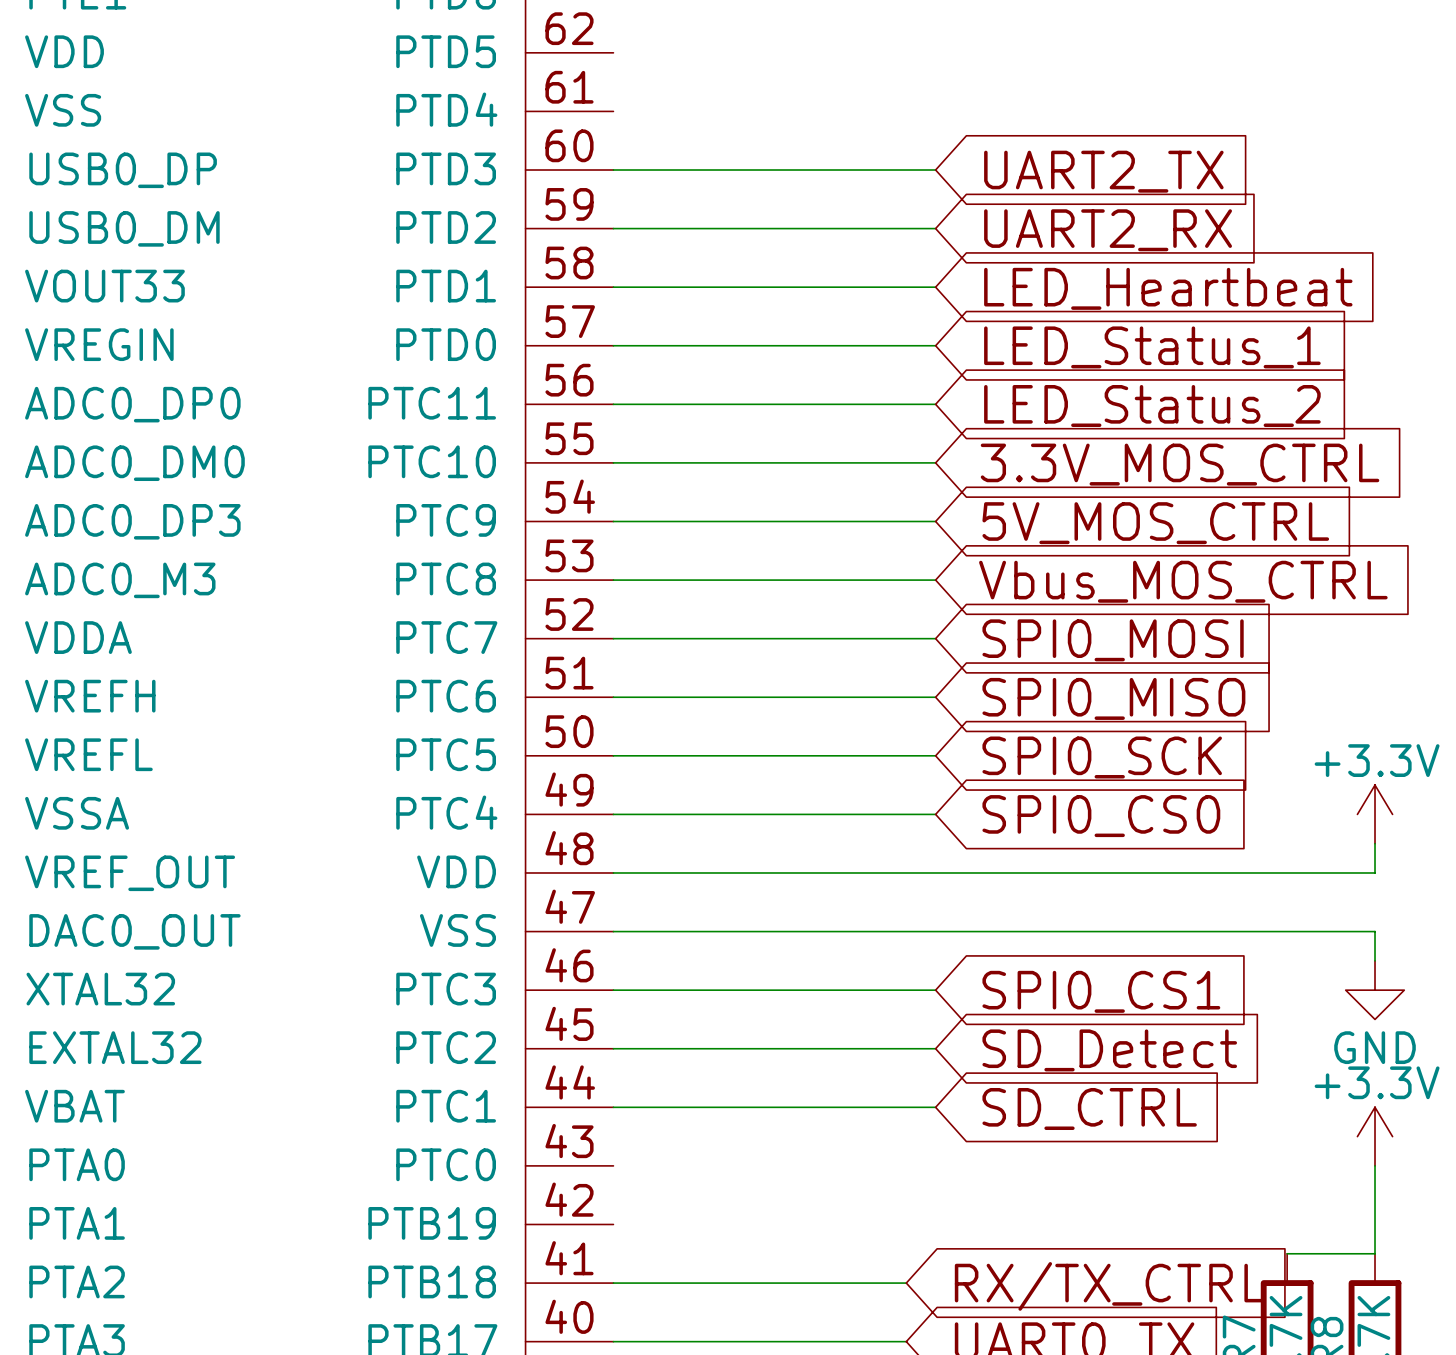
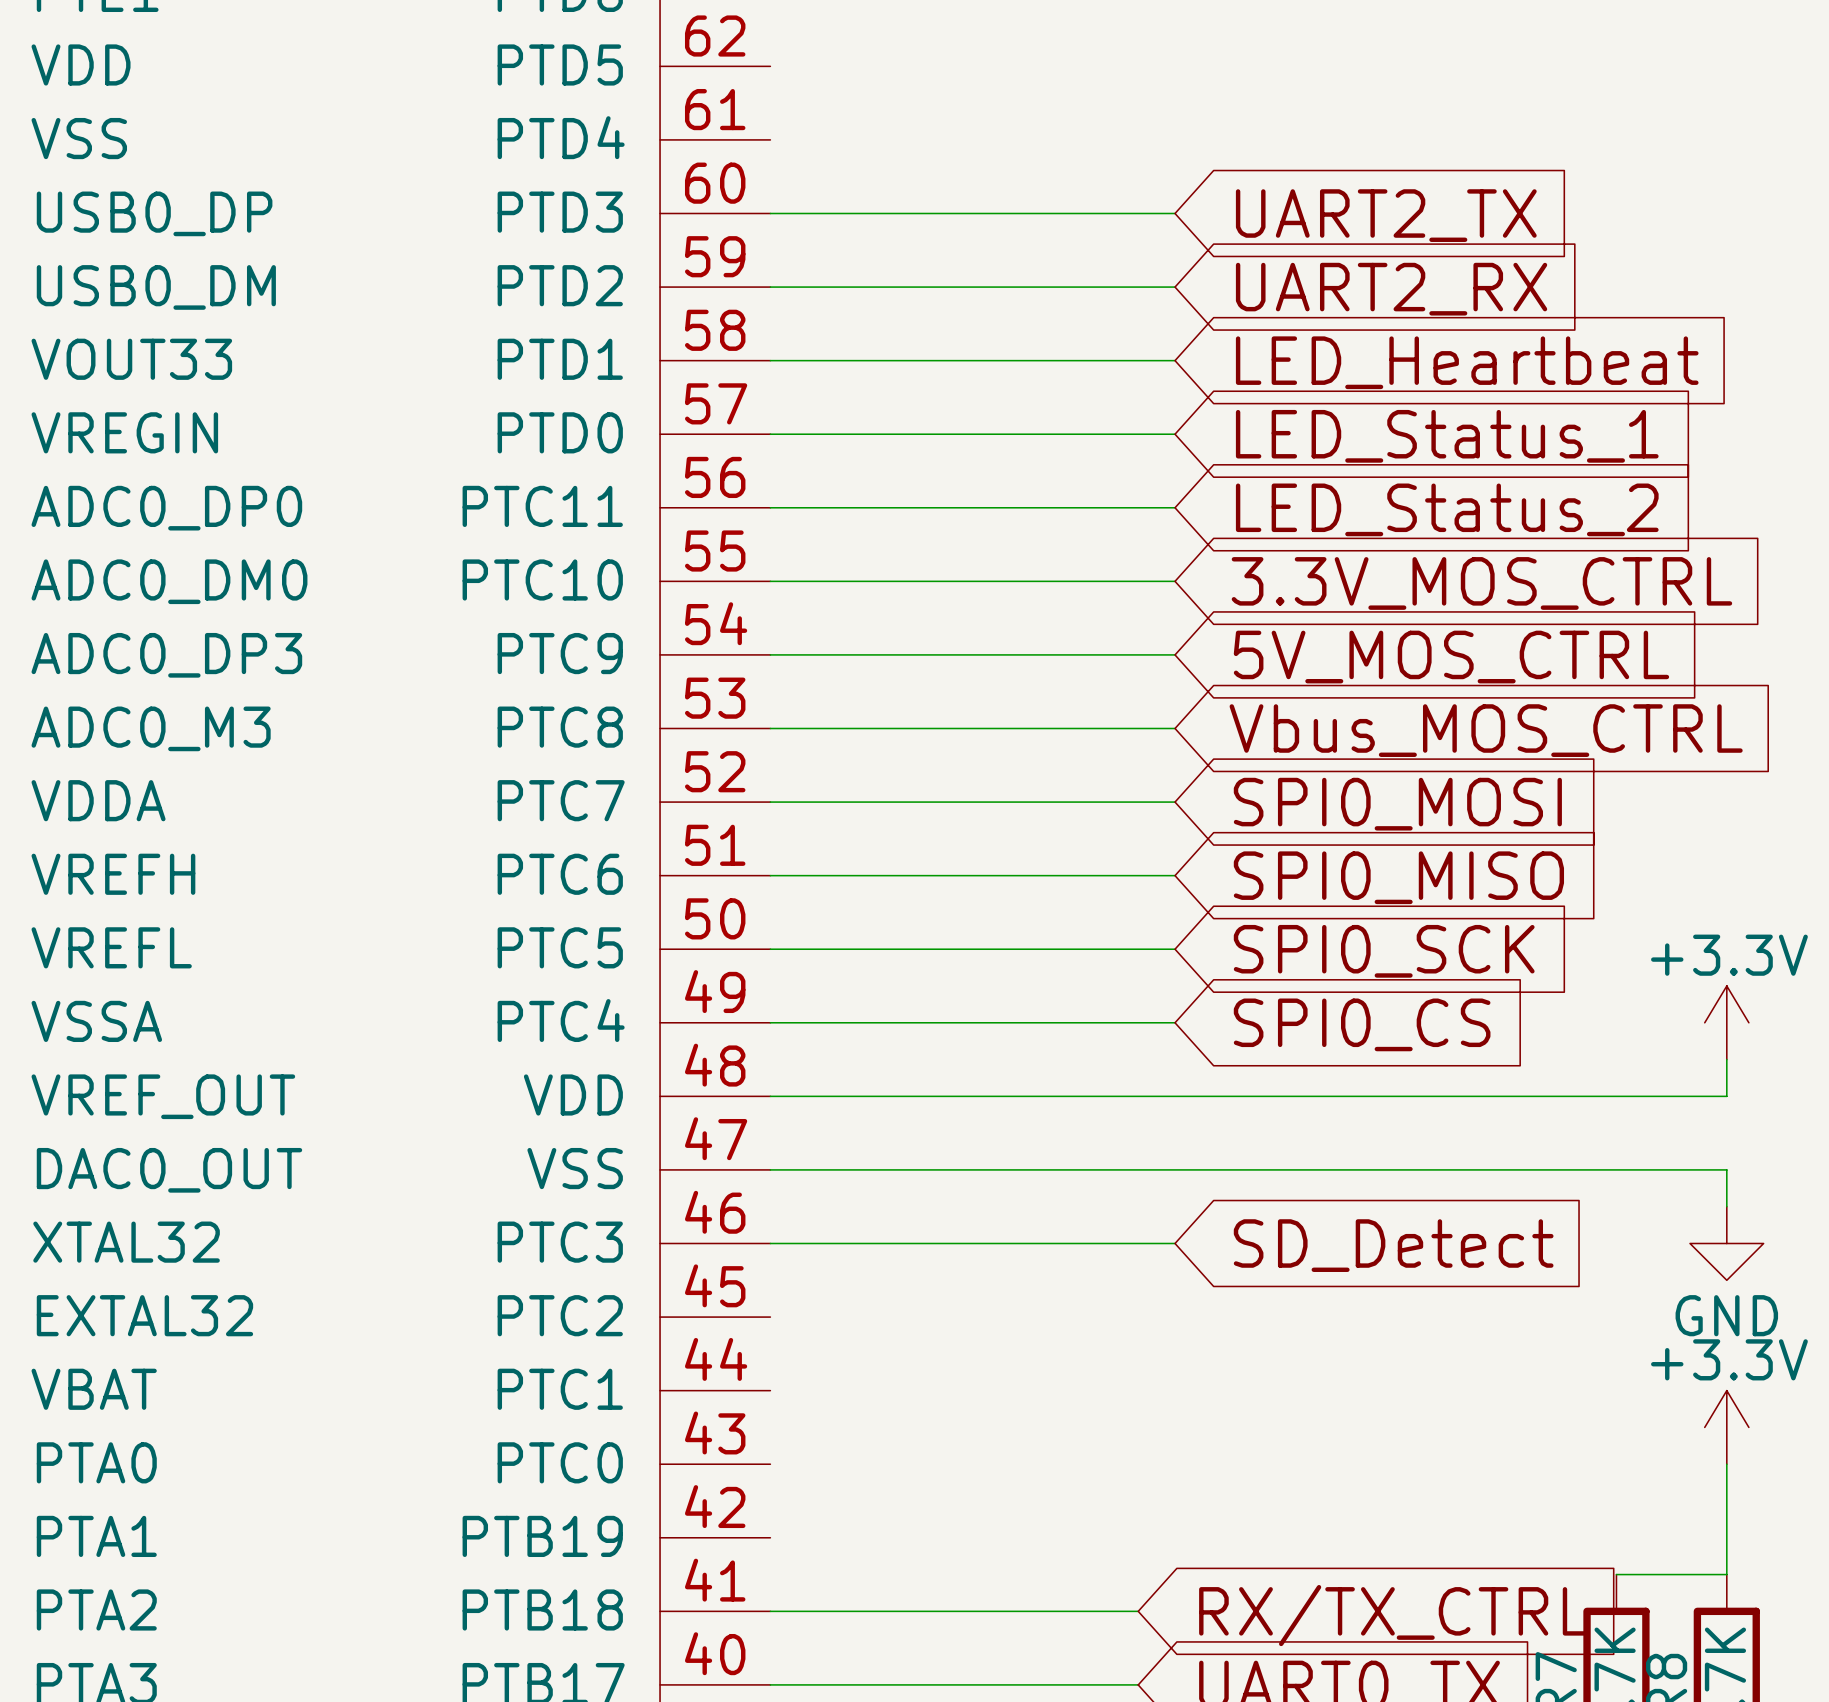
global label: SPI0_CS0 (1101, 816) -> SPI0_CS (1362, 1024)
global label: SPI0_CS1 (1101, 991) -> SD_Detect (1393, 1245)
wire: (613, 1048) (935, 1048) -> none
global label: SD_Detect (1109, 1050) -> none
wire: (613, 1107) (935, 1107) -> none
global label: SD_CTRL (1089, 1108) -> none

